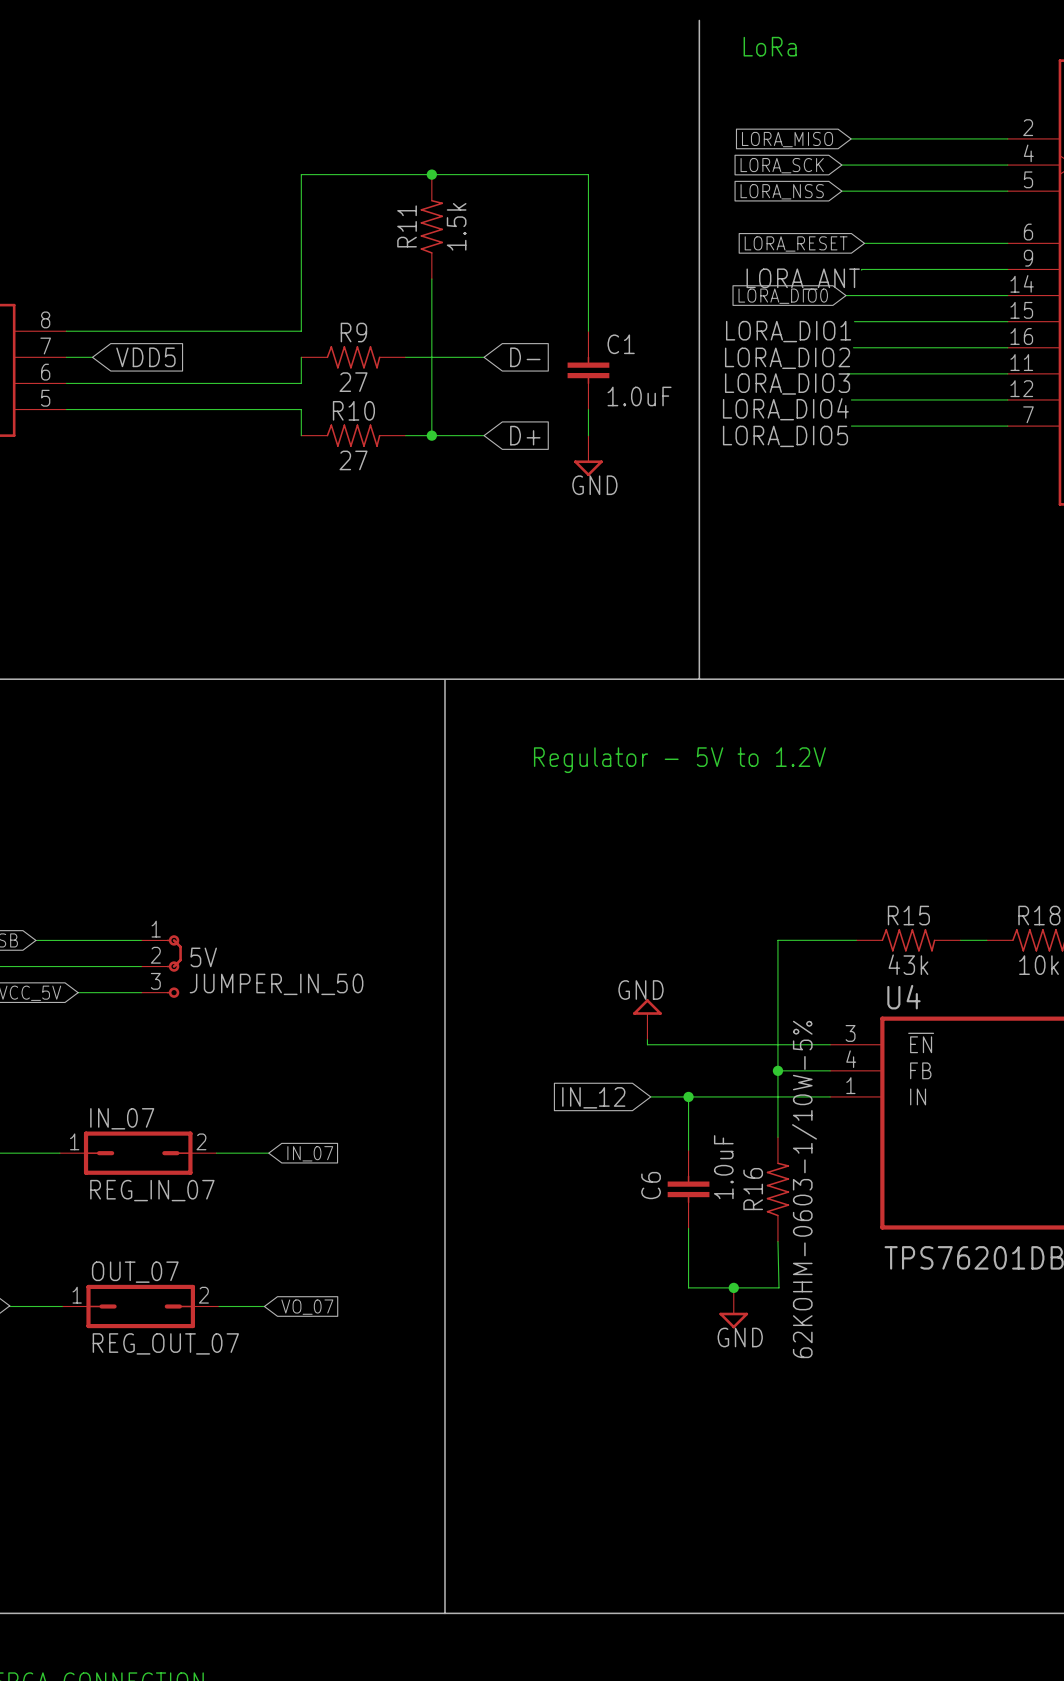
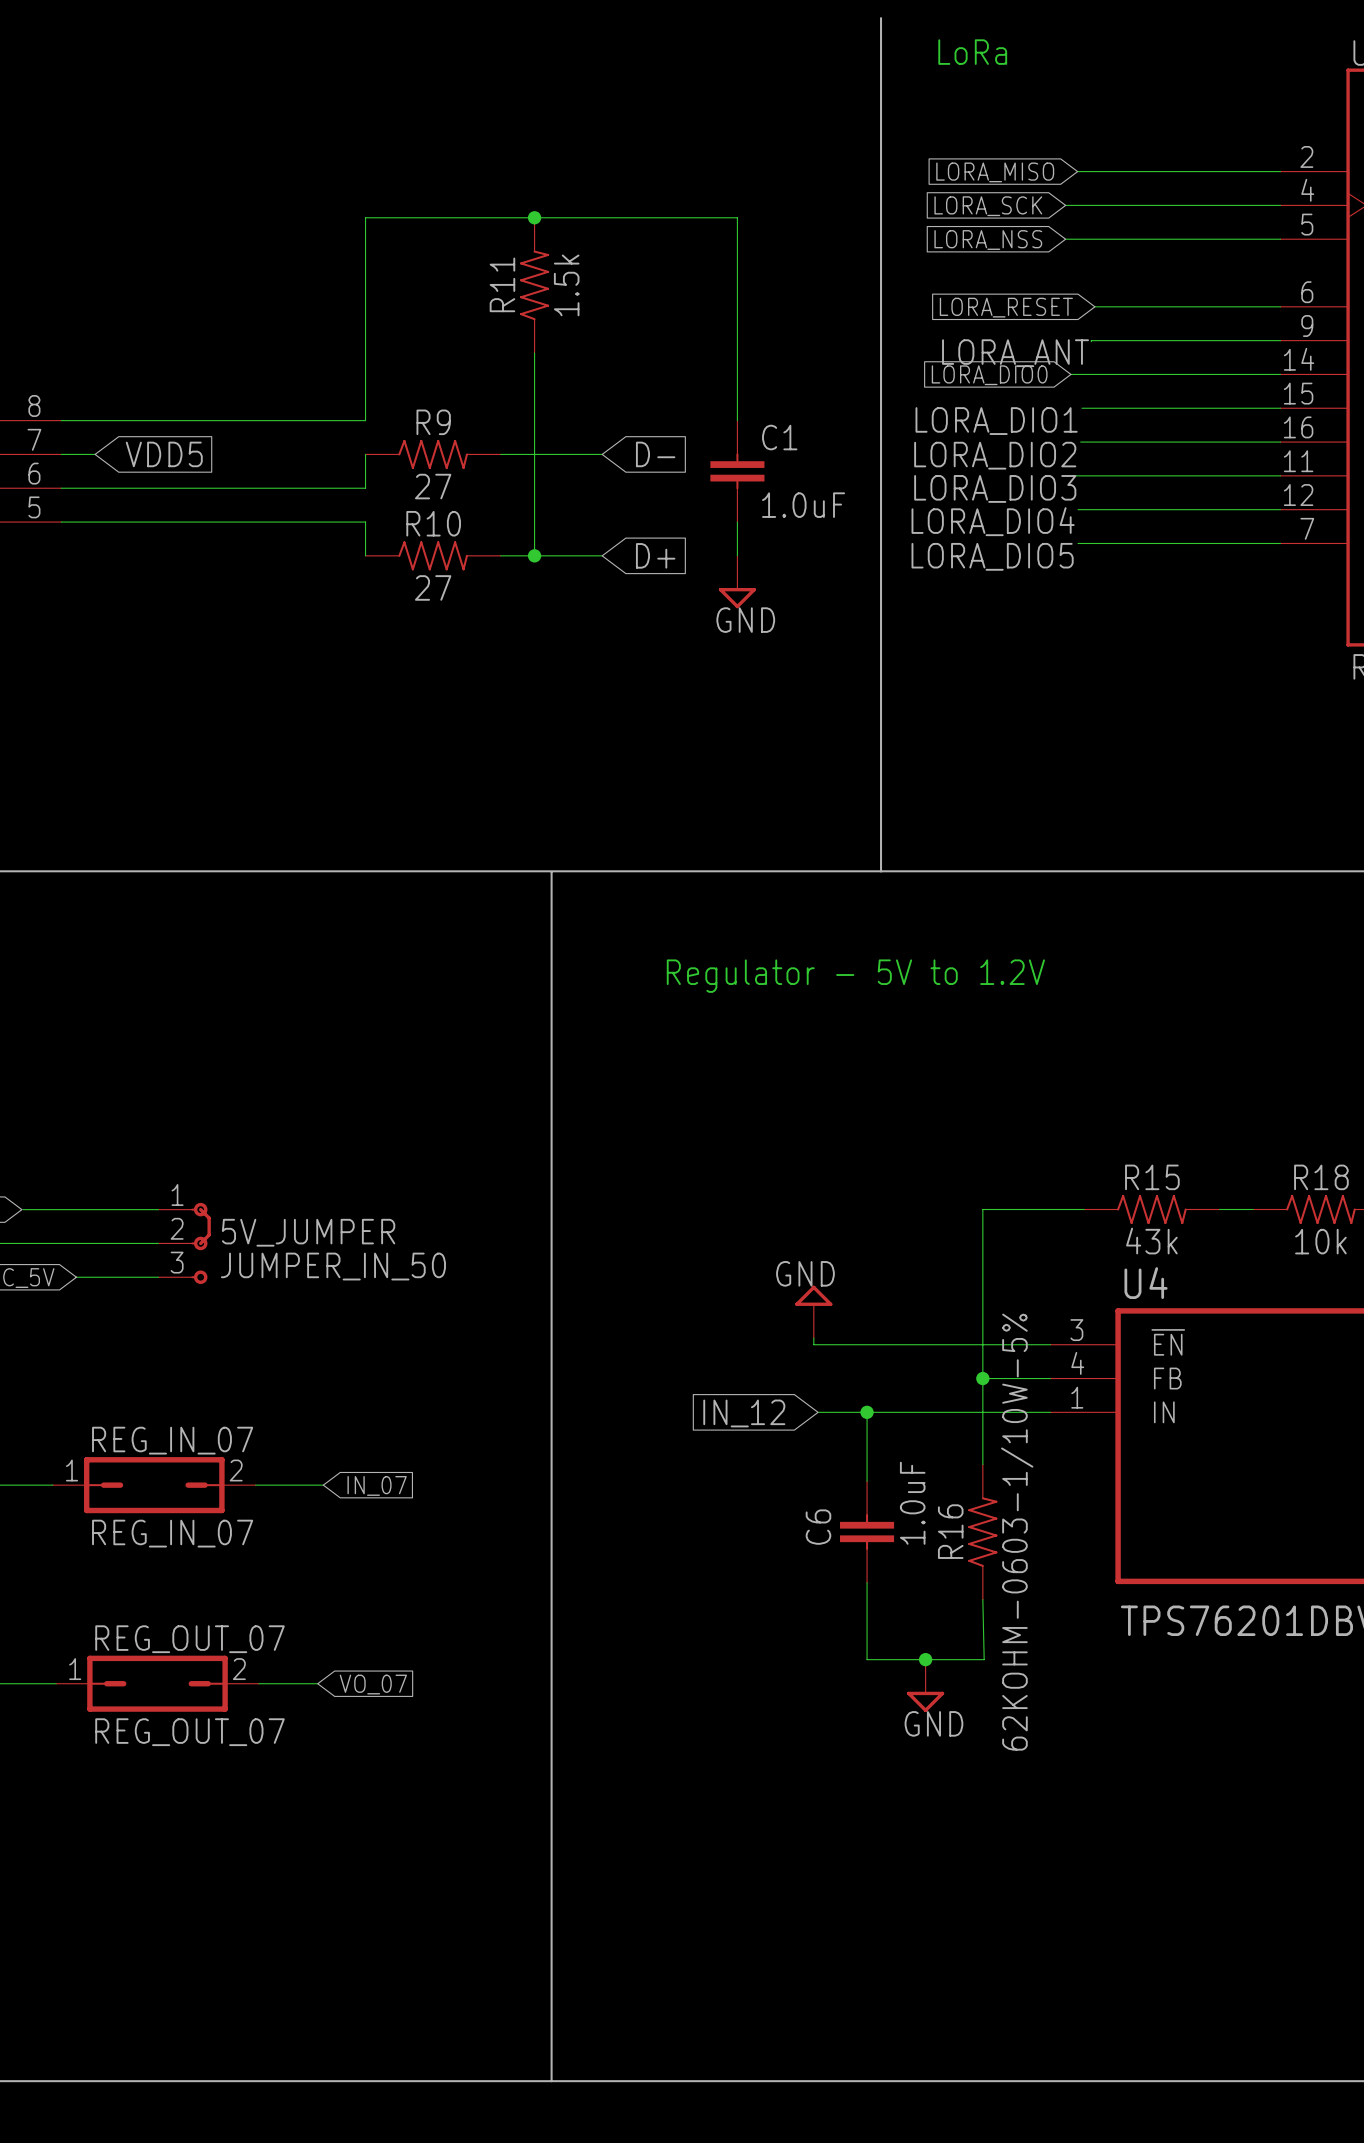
5V name: 5V (203, 957) -> 5V_JUMPER (308, 1232)
IN_07 name: IN_07 (122, 1118) -> REG_IN_07 (172, 1440)
OUT_07 name: OUT_07 (135, 1272) -> REG_OUT_07 (190, 1639)

